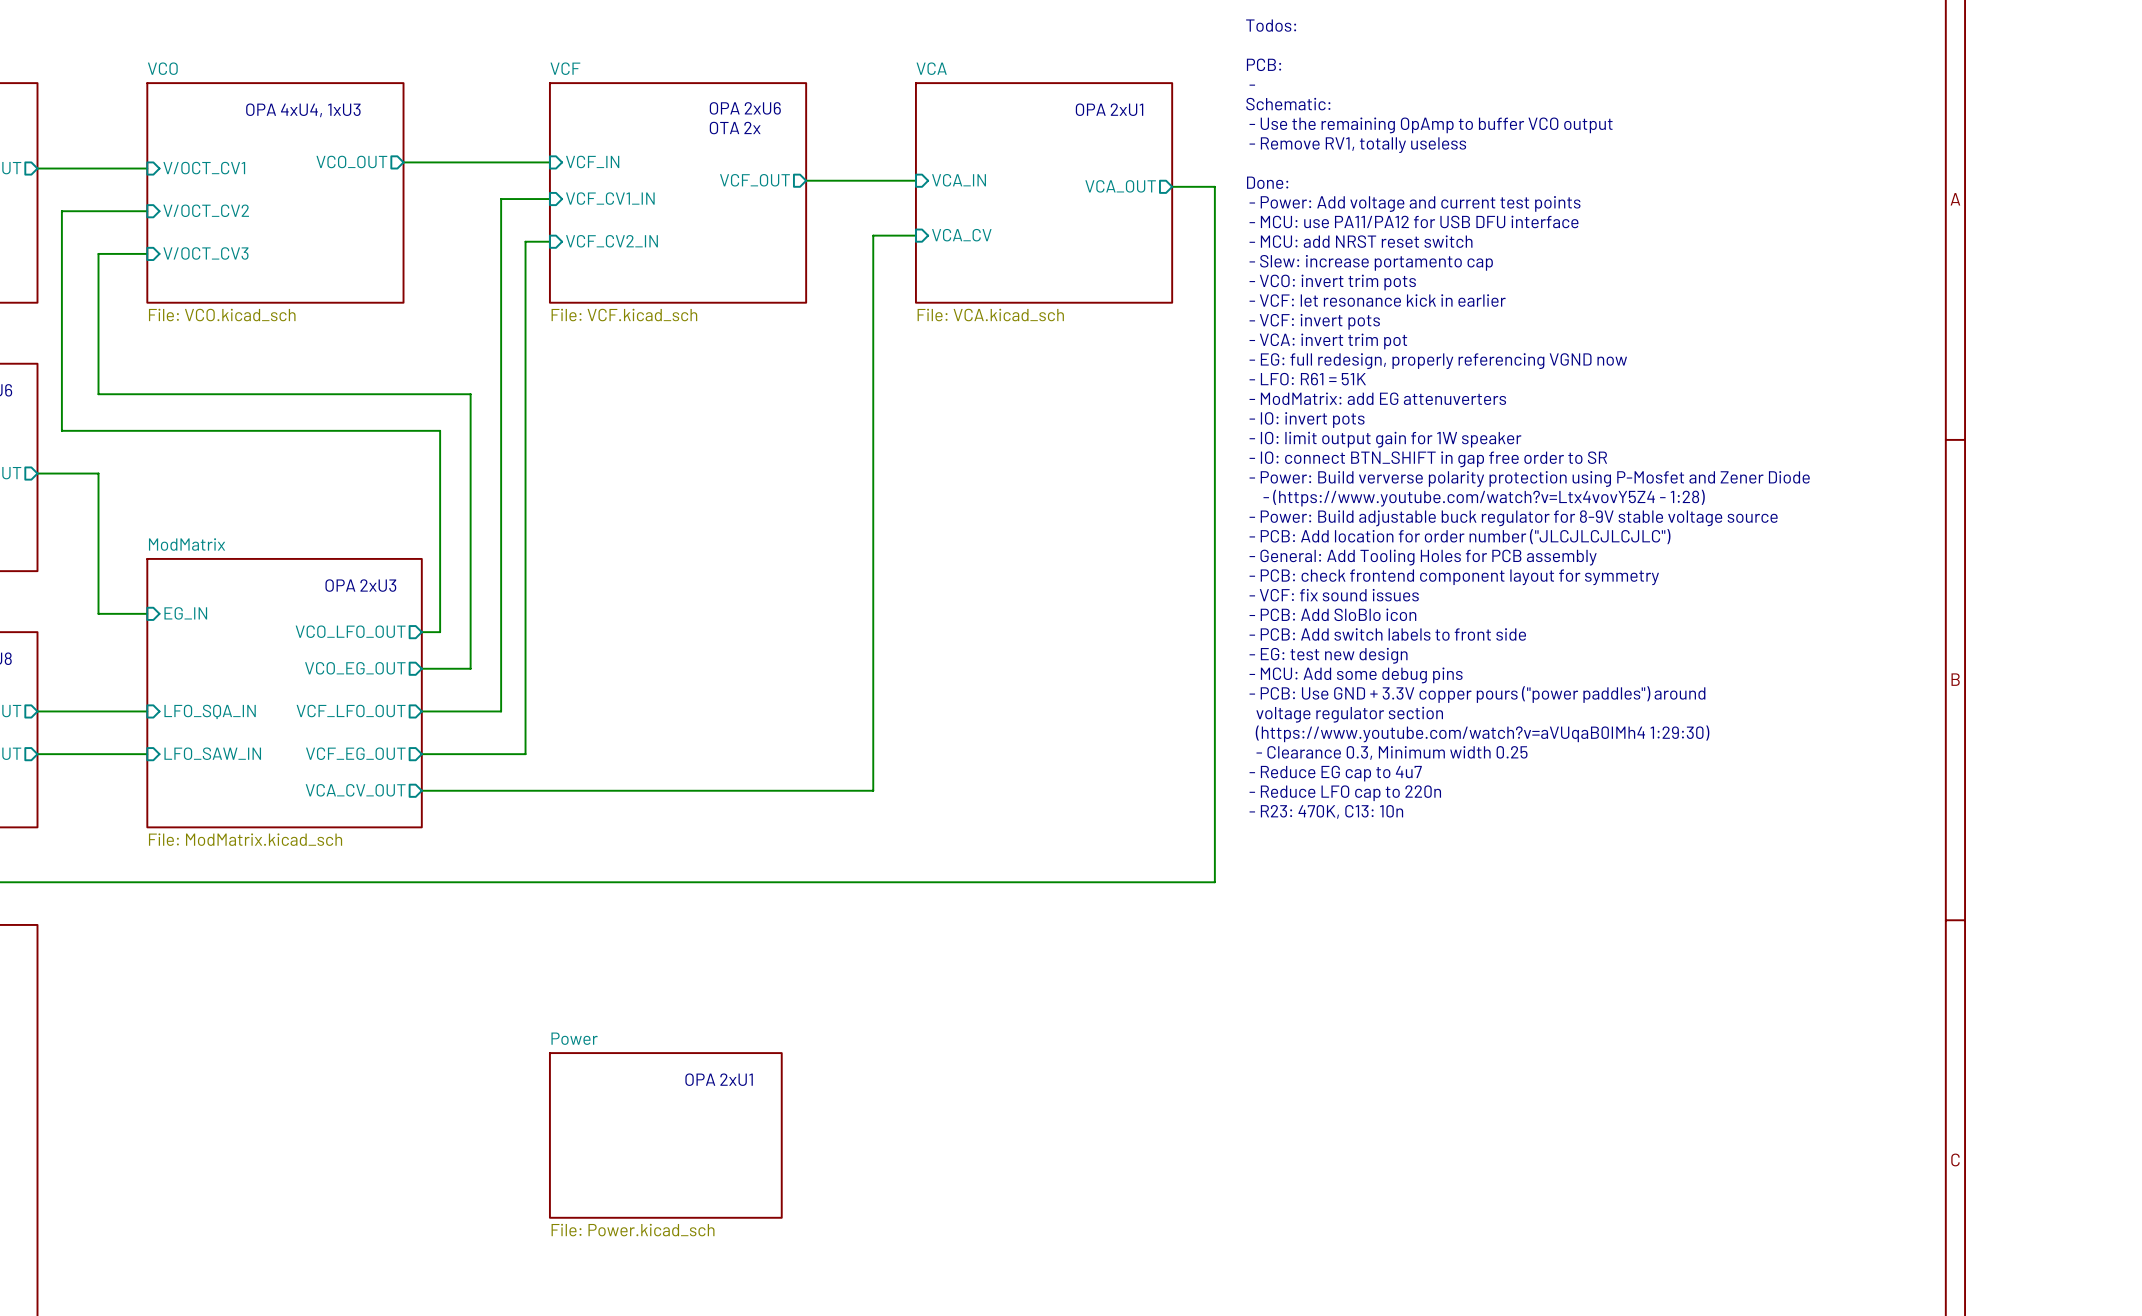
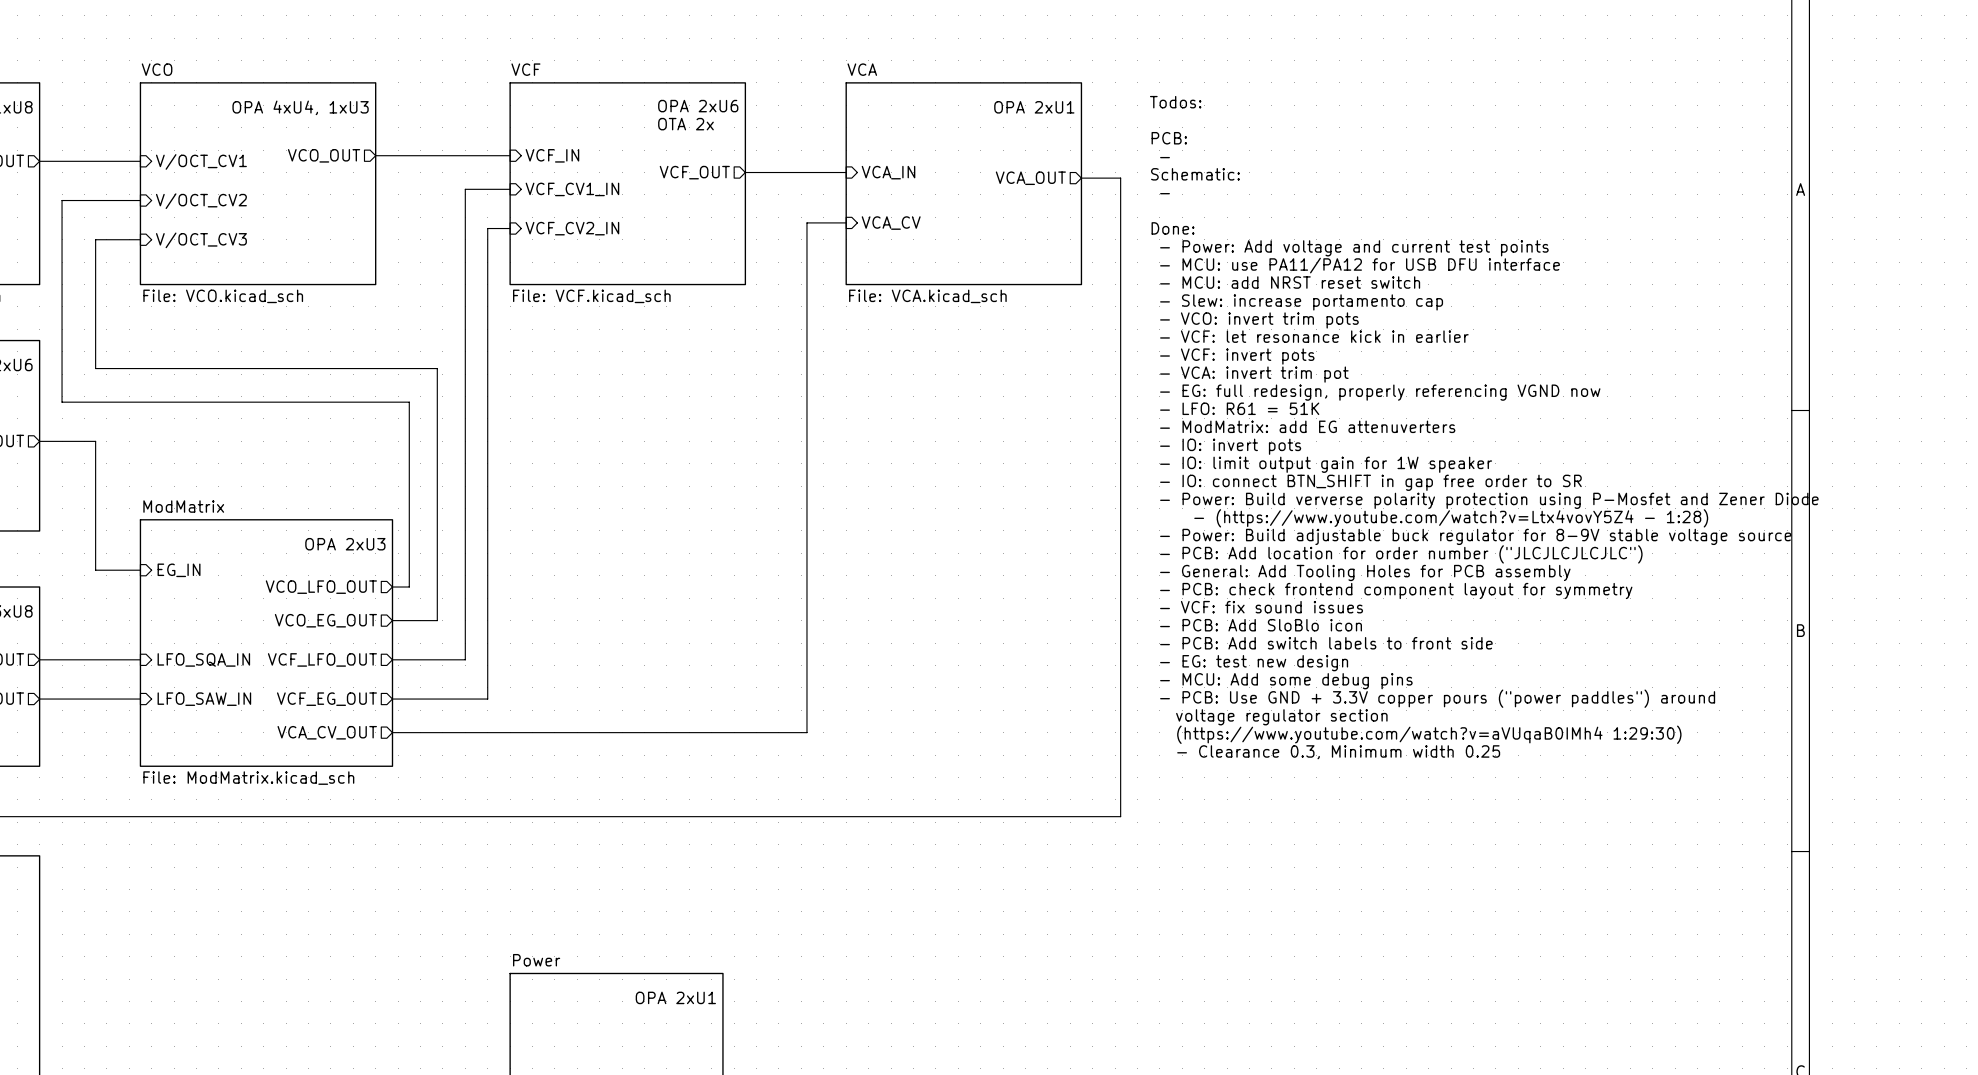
text: Todos: (1271, 25) -> none
text: PCB: (1264, 64) -> none
text position: - (1252, 85) -> - (1165, 157)
text: Schematic: (1288, 104) -> Todos: (1175, 102)
text: - Use the remaining OpAmp to buffer VCO output (1431, 125) -> none
text: - Remove RV1, totally useless (1357, 145) -> PCB: (1169, 138)
text: Done: (1267, 182) -> Schematic: (1195, 174)
text: - Power: Add voltage and current test points (1415, 203) -> - (1165, 193)
text: - MCU: use PA11/PA12 for USB DFU interface (1413, 221) -> none
text: - MCU: add NRST reset switch (1361, 241) -> Done: (1173, 228)
text: - Slew: increase portamento cap (1371, 262) -> - Power: Add voltage and current test points (1354, 248)
text: - VCO: invert trim pots (1332, 282) -> - MCU: use PA11/PA12 for USB DFU interface (1359, 265)
text: - VCF: let resonance kick in earlier (1377, 300) -> - MCU: add NRST reset switch (1290, 282)
text: - VCF: invert pots (1314, 321) -> - Slew: increase portamento cap (1301, 302)
text: - VCA: invert trim pot (1328, 341) -> - VCO: invert trim pots (1259, 320)
text: - EG: full redesign, properly referencing VGND now (1438, 361) -> - VCF: let resonance kick in earlier (1314, 336)
text: - LFO: R61 = 51K (1307, 379) -> - VCF: invert pots (1237, 356)
text: - ModMatrix: add EG attenuverters (1377, 398) -> - VCA: invert trim pot (1254, 374)
text: - IO: invert pots (1307, 420) -> - EG: full redesign, properly referencing VGND now (1380, 392)
text: - IO: limit output gain for 1W speaker (1385, 439) -> - LFO: R61 = 51K (1239, 408)
text: - IO: connect BTN_SHIFT in gap free order to SR (1428, 459) -> - ModMatrix: add EG attenuverters (1307, 426)
text: - Power: Build ververse polarity protection using P-Mosfet and Zener Diode (1529, 478) -> - IO: invert pots (1230, 446)
text: - (https://www.youtube.com/watch?v=Ltx4vovY5Z4 - 1:28) (1484, 498) -> - IO: limit output gain for 1W speaker (1326, 464)
text: - Power: Build adjustable buck regulator for 8-9V stable voltage source (1513, 518) -> - IO: connect BTN_SHIFT in gap free order to SR (1370, 482)
text: - PCB: Add location for order number ("JLCJLCJLCJLC") (1460, 536) -> - Power: Build ververse polarity protection using P-Mosfet and Zener Diode (1489, 500)
text: - General: Add Tooling Holes for PCB assembly (1423, 557) -> - (https://www.youtube.com/watch?v=Ltx4vovY5Z4 - 1:28) (1451, 518)
text: - PCB: check frontend component layout for symmetry (1454, 577) -> - Power: Build adjustable buck regulator for 8-9V stable voltage source (1475, 536)
text: - VCF: fix sound issues (1334, 595) -> - PCB: Add location for order number ("JLCJLCJLCJLC") (1401, 554)
text: - PCB: Add SloBlo icon (1332, 614) -> - General: Add Tooling Holes for PCB assembly (1365, 572)
text: - PCB: Add switch labels to front side (1387, 634) -> - PCB: check frontend component layout for symmetry (1396, 591)
text: - EG: test new design (1328, 655) -> - VCF: fix sound issues (1261, 607)
text: - MCU: Add some debug pins (1356, 675) -> - PCB: Add SloBlo icon (1261, 625)
text: - PCB: Use GND + 3.3V copper pours ("power paddles") around (1477, 694) -> - PCB: Add switch labels to front side (1326, 643)
text: voltage regulator section (1349, 714) -> - EG: test new design (1254, 663)
text: (https://www.youtube.com/watch?v=aVUqaB0IMh4 1:29:30) (1482, 733) -> - MCU: Add some debug pins (1286, 681)
text: - Clearance 0.3, Minimum width 0.25 (1392, 752) -> - PCB: Use GND + 3.3V copper pours ("power paddles") around (1437, 698)
text: - Reduce EG cap to 4u7 (1335, 773) -> voltage regulator section (1281, 717)
text: - Reduce LFO cap to 220n (1345, 793) -> (https://www.youtube.com/watch?v=aVUqaB0IMh4 1:29:30) (1429, 734)
text: - R23: 470K, C13: 10n (1326, 811) -> - Clearance 0.3, Minimum width 0.25 (1338, 752)

